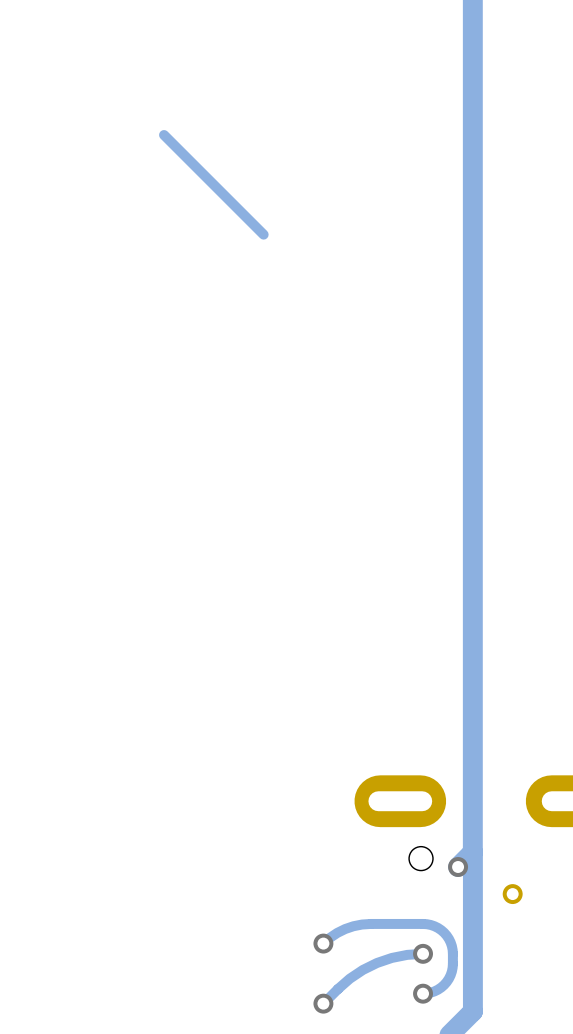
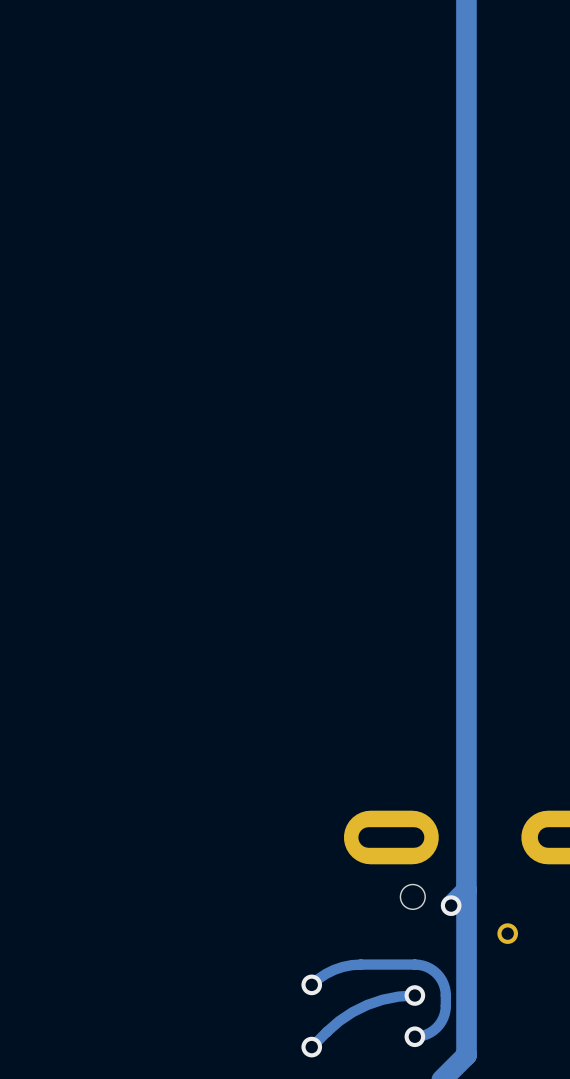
track: (164, 135) (263, 234) -> none

